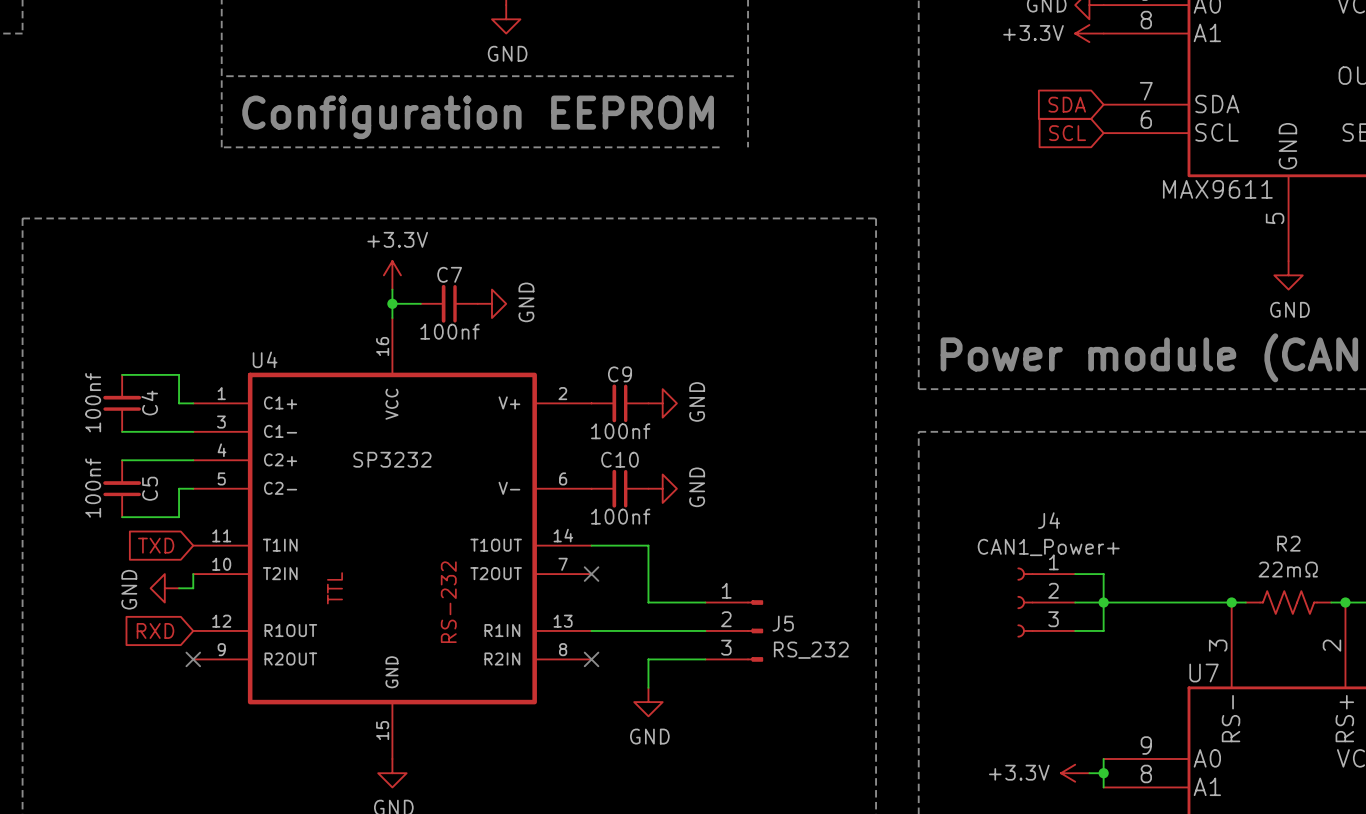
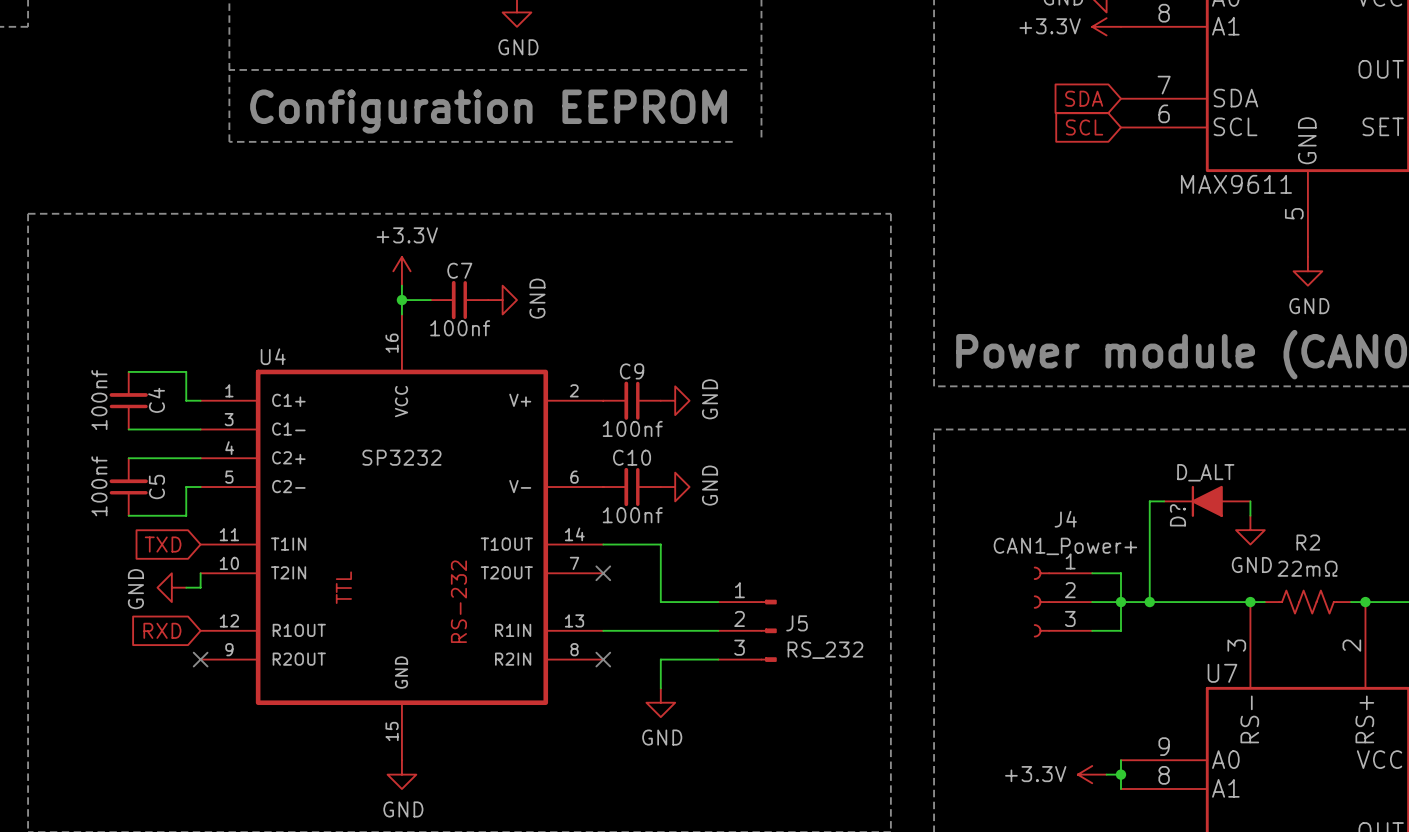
wire: none -> (1164, 501) (1149, 501) (1149, 602)
D?: none -> D_ALT (1207, 501)
wire: none -> (1250, 501) (1250, 515)
power symbol: none -> GND (1250, 530)
junction: none -> (1149, 602)

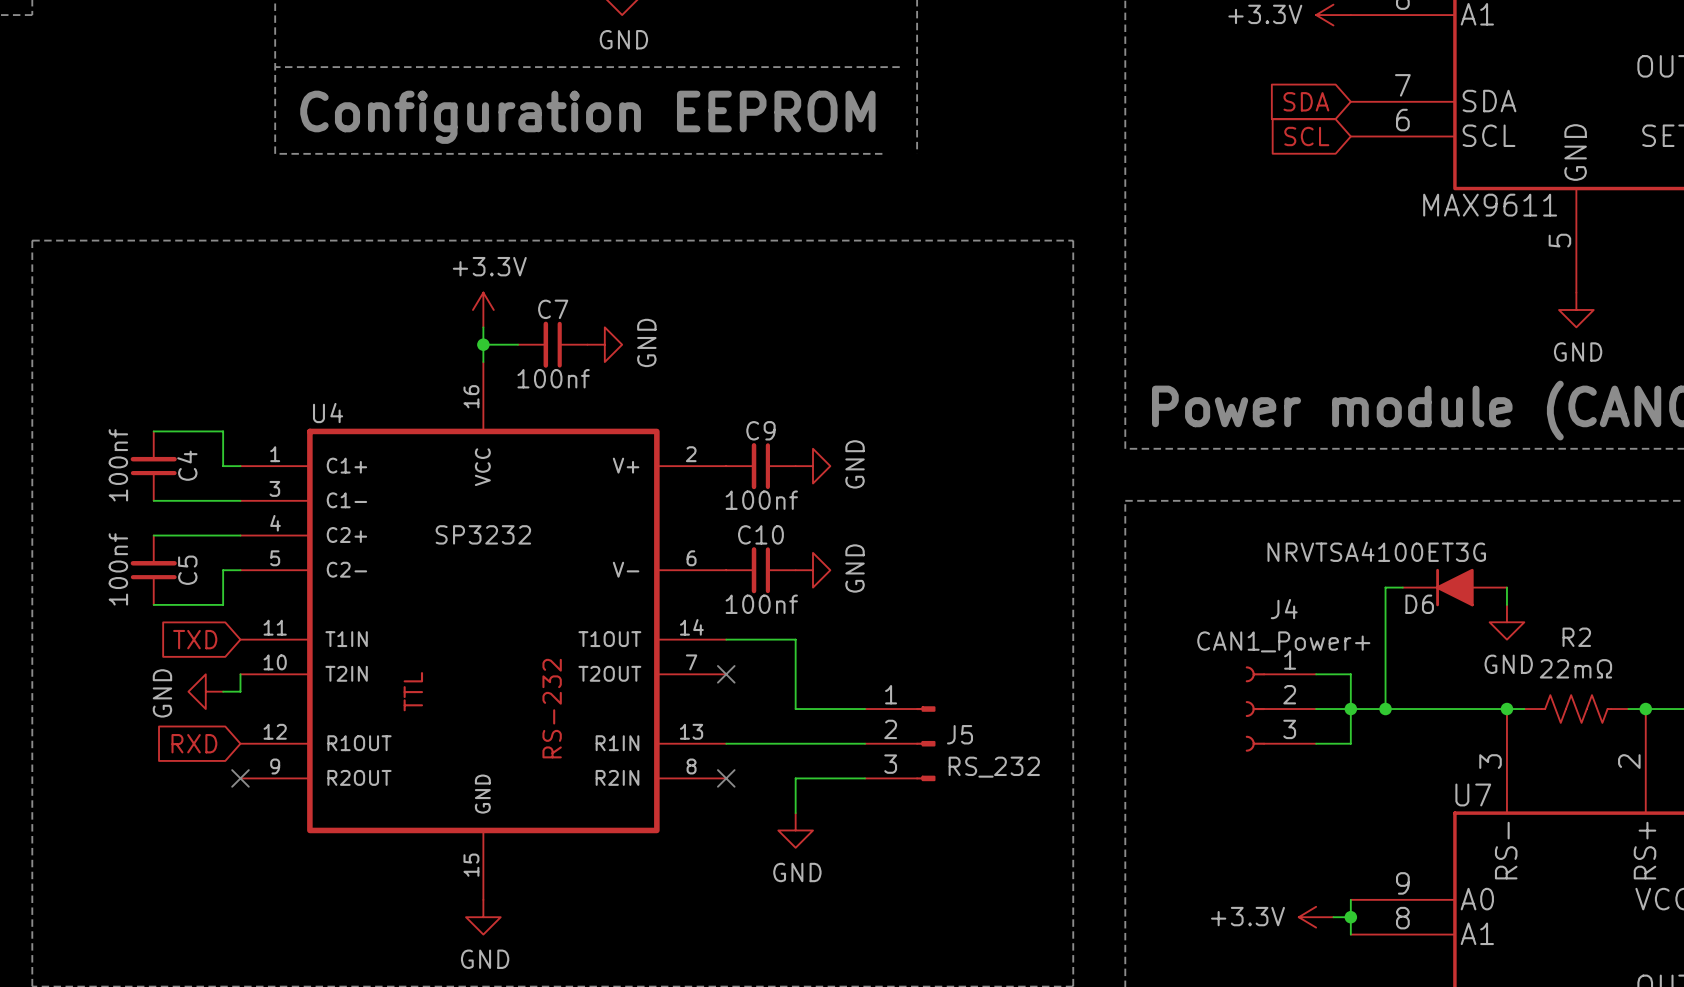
D? value: D_ALT (1205, 472) -> NRVTSA4100ET3G (1376, 551)
D? name: D? (1177, 515) -> D6 (1419, 604)

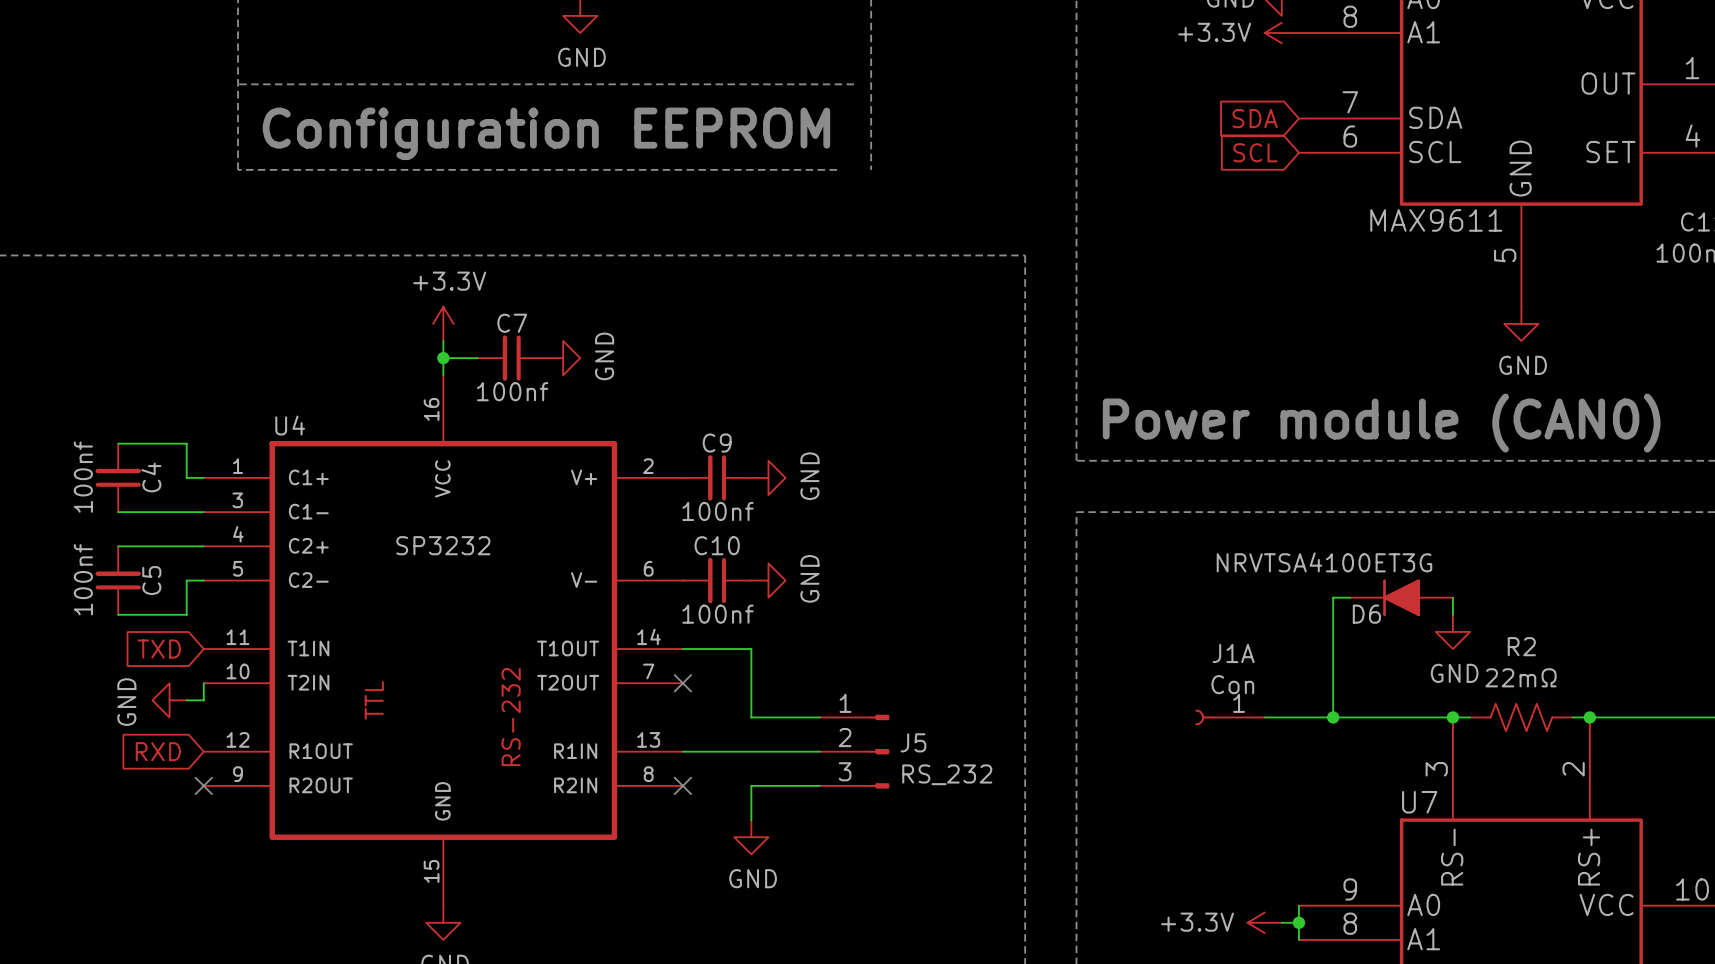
wire: (1316, 674) (1350, 674) (1350, 743) (1316, 743) -> none
J4: CAN1_Power+ (1280, 709) -> none
J1A: none -> Con (1229, 717)
junction: (1350, 709) -> none

